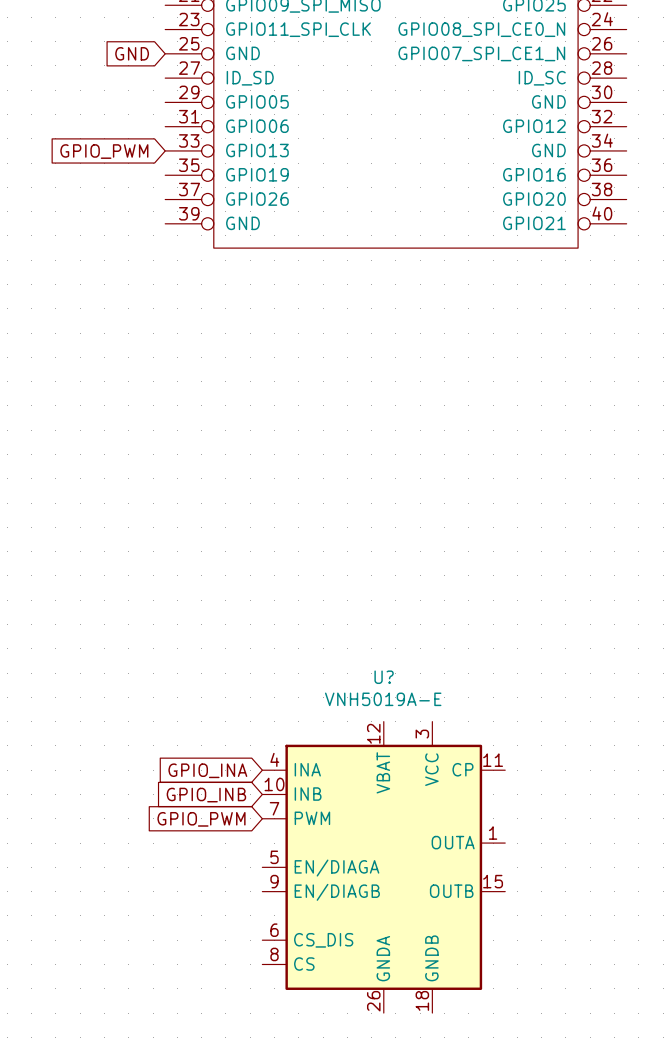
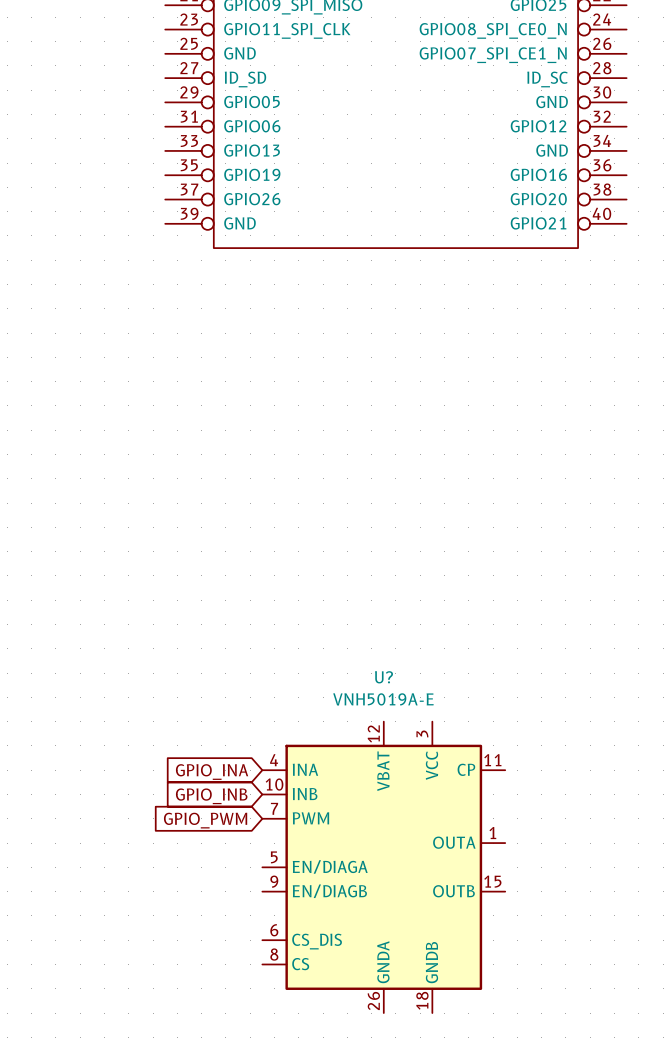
global label: GND (132, 53) -> none
global label: GPIO_PWM (104, 151) -> none

